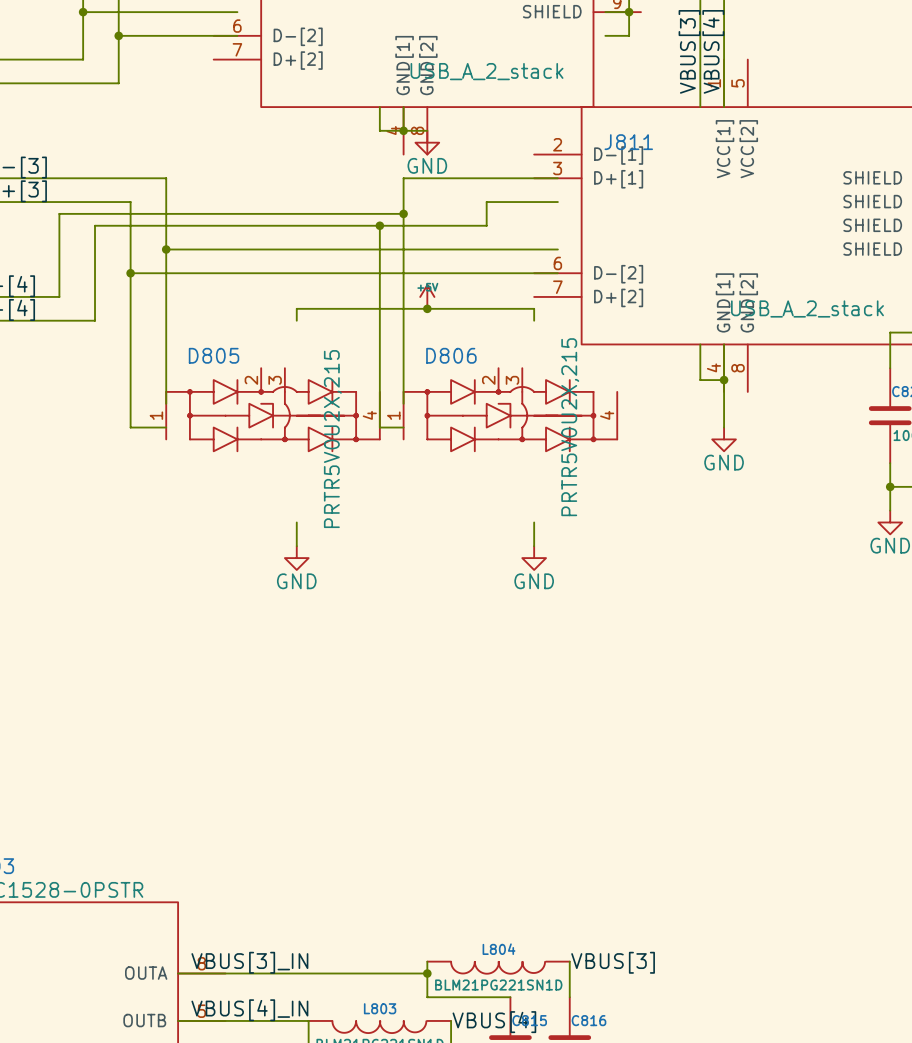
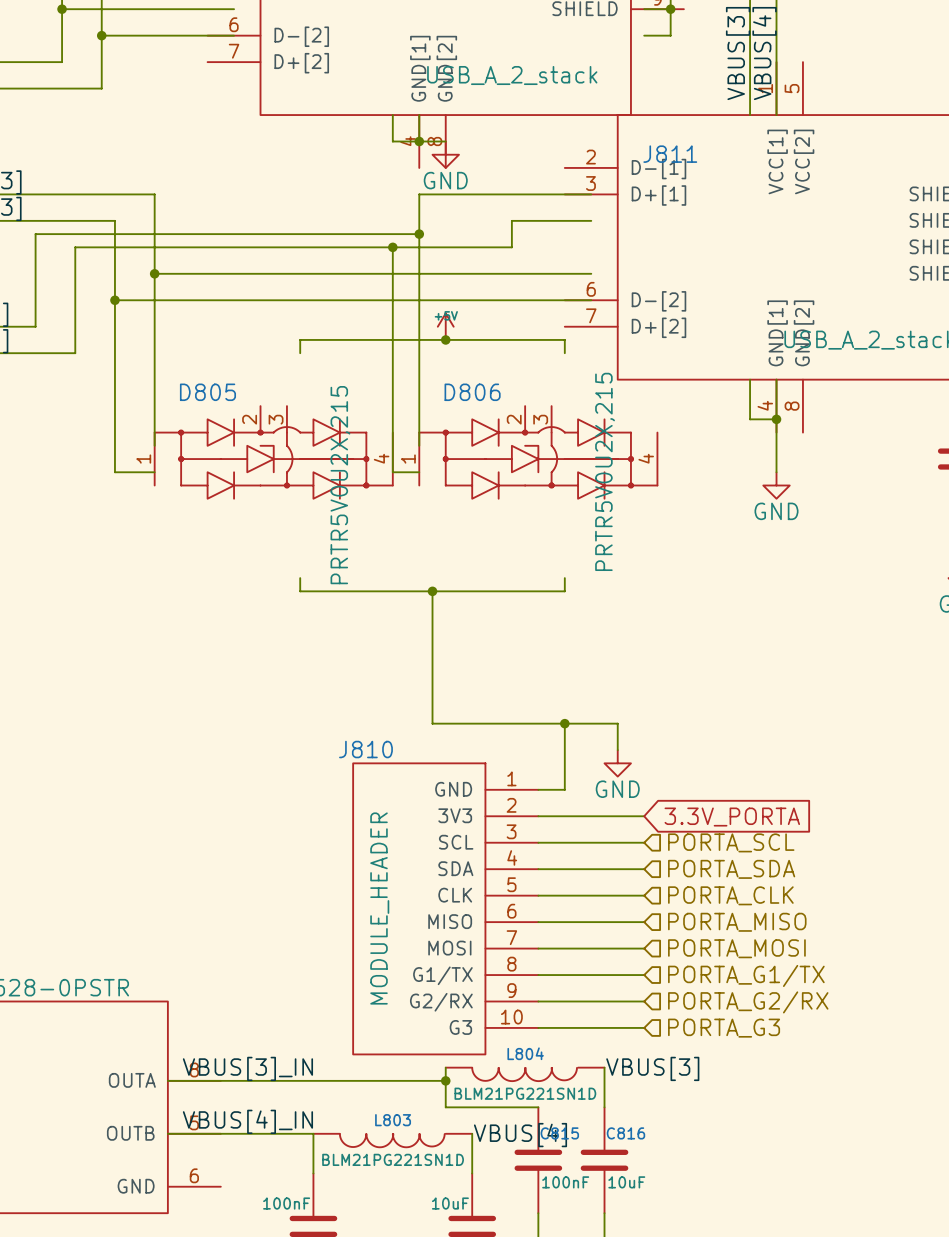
wire: (296, 534) (296, 546) -> (300, 591) (564, 591)
wire: none -> (432, 591) (432, 723) (617, 723) (617, 750)
junction: none -> (432, 591)
wire: (534, 534) (534, 546) -> none
power symbol: GND (296, 558) -> none
power symbol position: GND (534, 558) -> GND (617, 763)
wire: none -> (564, 723) (564, 789) (538, 789)
junction: none -> (564, 723)
wire: none -> (538, 816) (644, 816)
global label: none -> 3.3V_PORTA (732, 817)
wire: none -> (538, 842) (644, 842)
hierarchical label: none -> PORTA_SCL (731, 842)
wire: none -> (538, 869) (644, 869)
hierarchical label: none -> PORTA_SDA (731, 869)
wire: none -> (538, 895) (644, 895)
hierarchical label: none -> PORTA_CLK (730, 895)
J810: none -> MODULE_HEADER (445, 908)
wire: none -> (538, 922) (644, 922)
hierarchical label: none -> PORTA_MISO (737, 922)
wire: none -> (538, 948) (644, 948)
hierarchical label: none -> PORTA_MOSI (736, 948)
wire: none -> (538, 975) (644, 975)
hierarchical label: none -> PORTA_G1/TX (746, 975)
wire: none -> (538, 1001) (644, 1001)
hierarchical label: none -> PORTA_G2/RX (748, 1002)
wire: none -> (538, 1027) (644, 1027)
hierarchical label: none -> PORTA_G3 (724, 1028)

